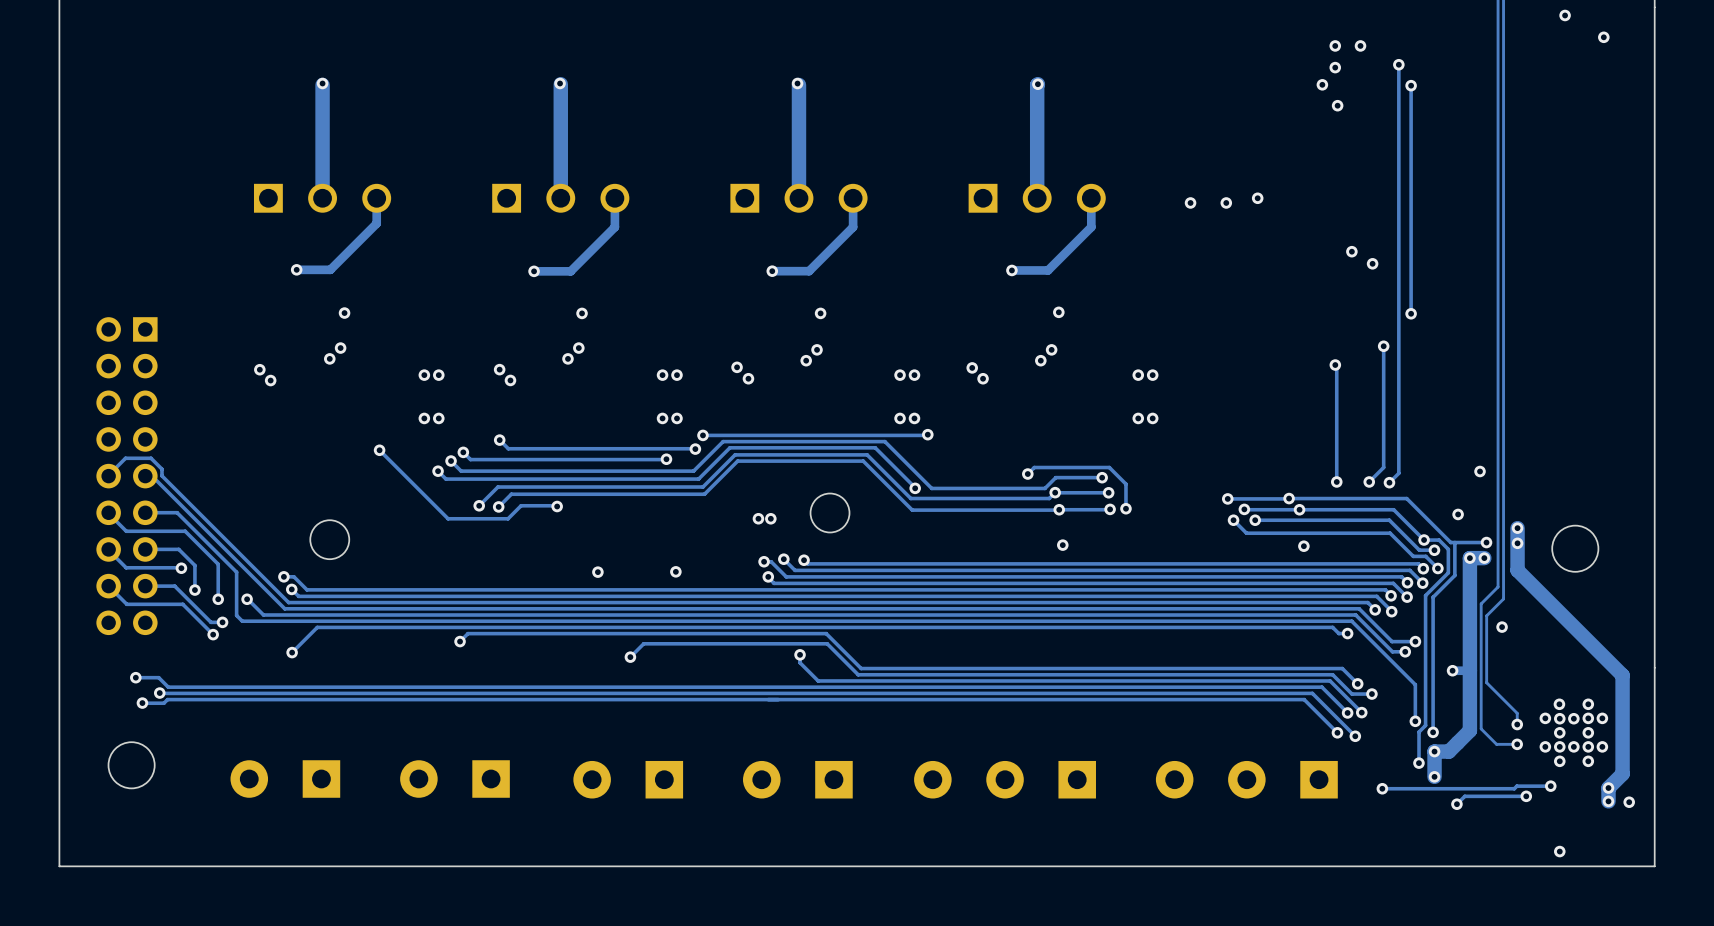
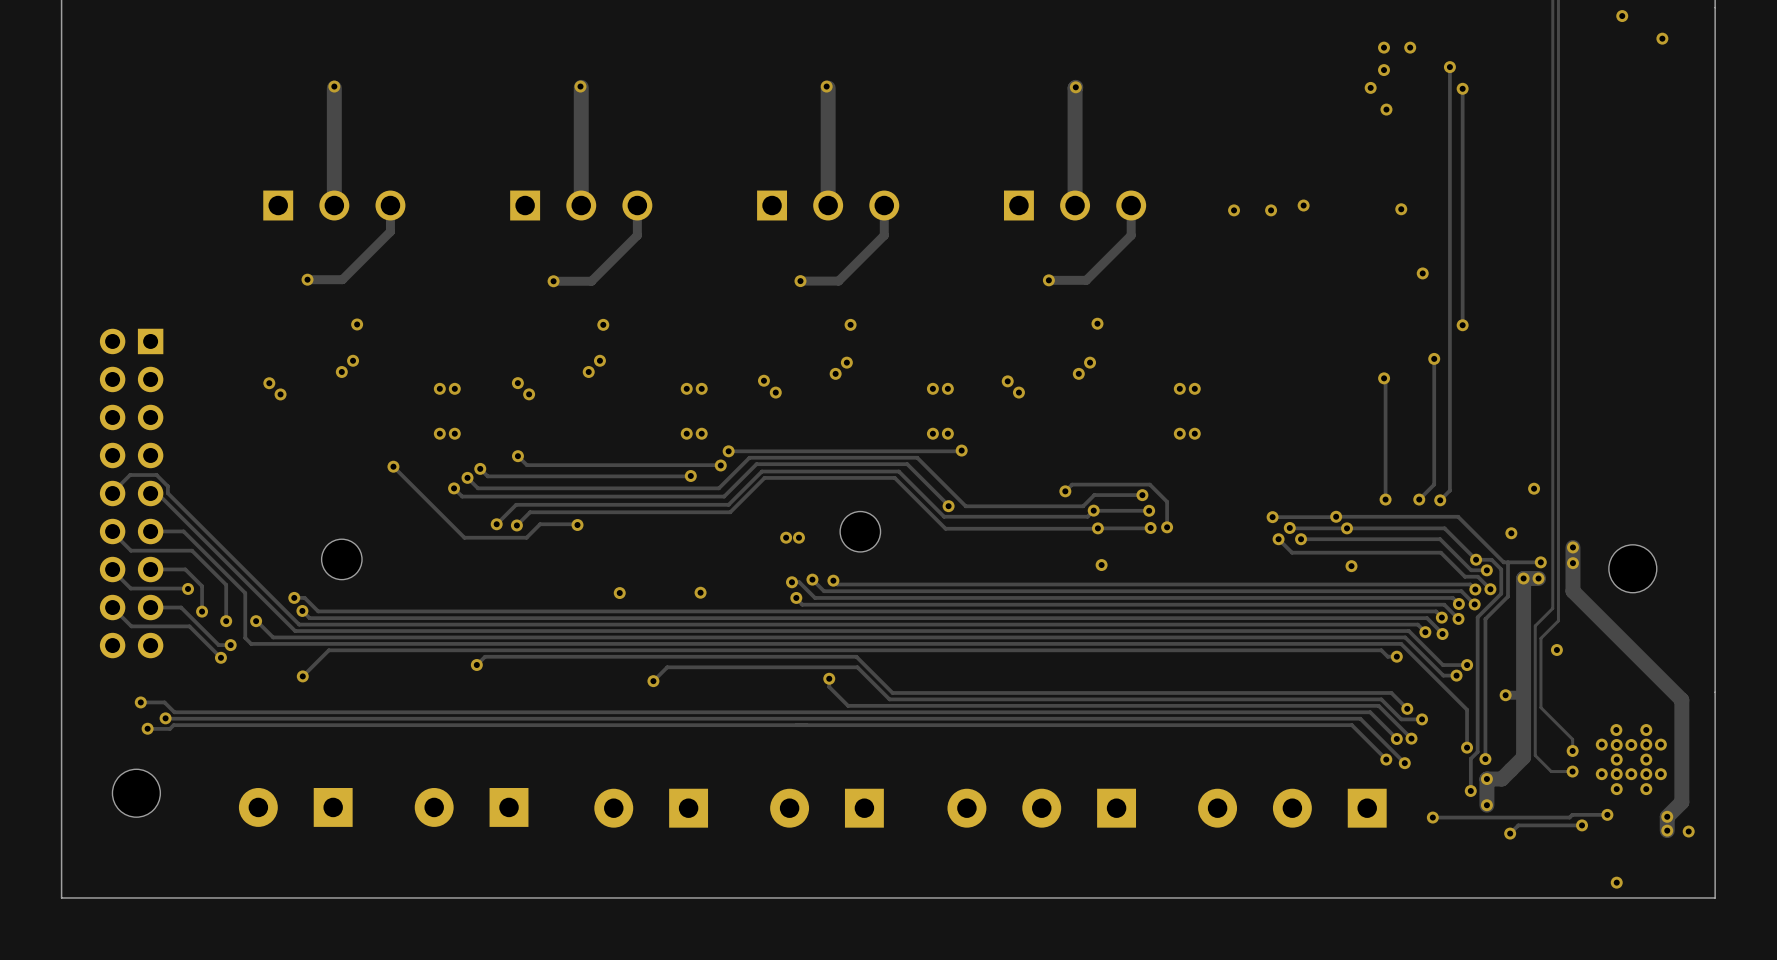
via position: (1351, 251) -> (1401, 209)

